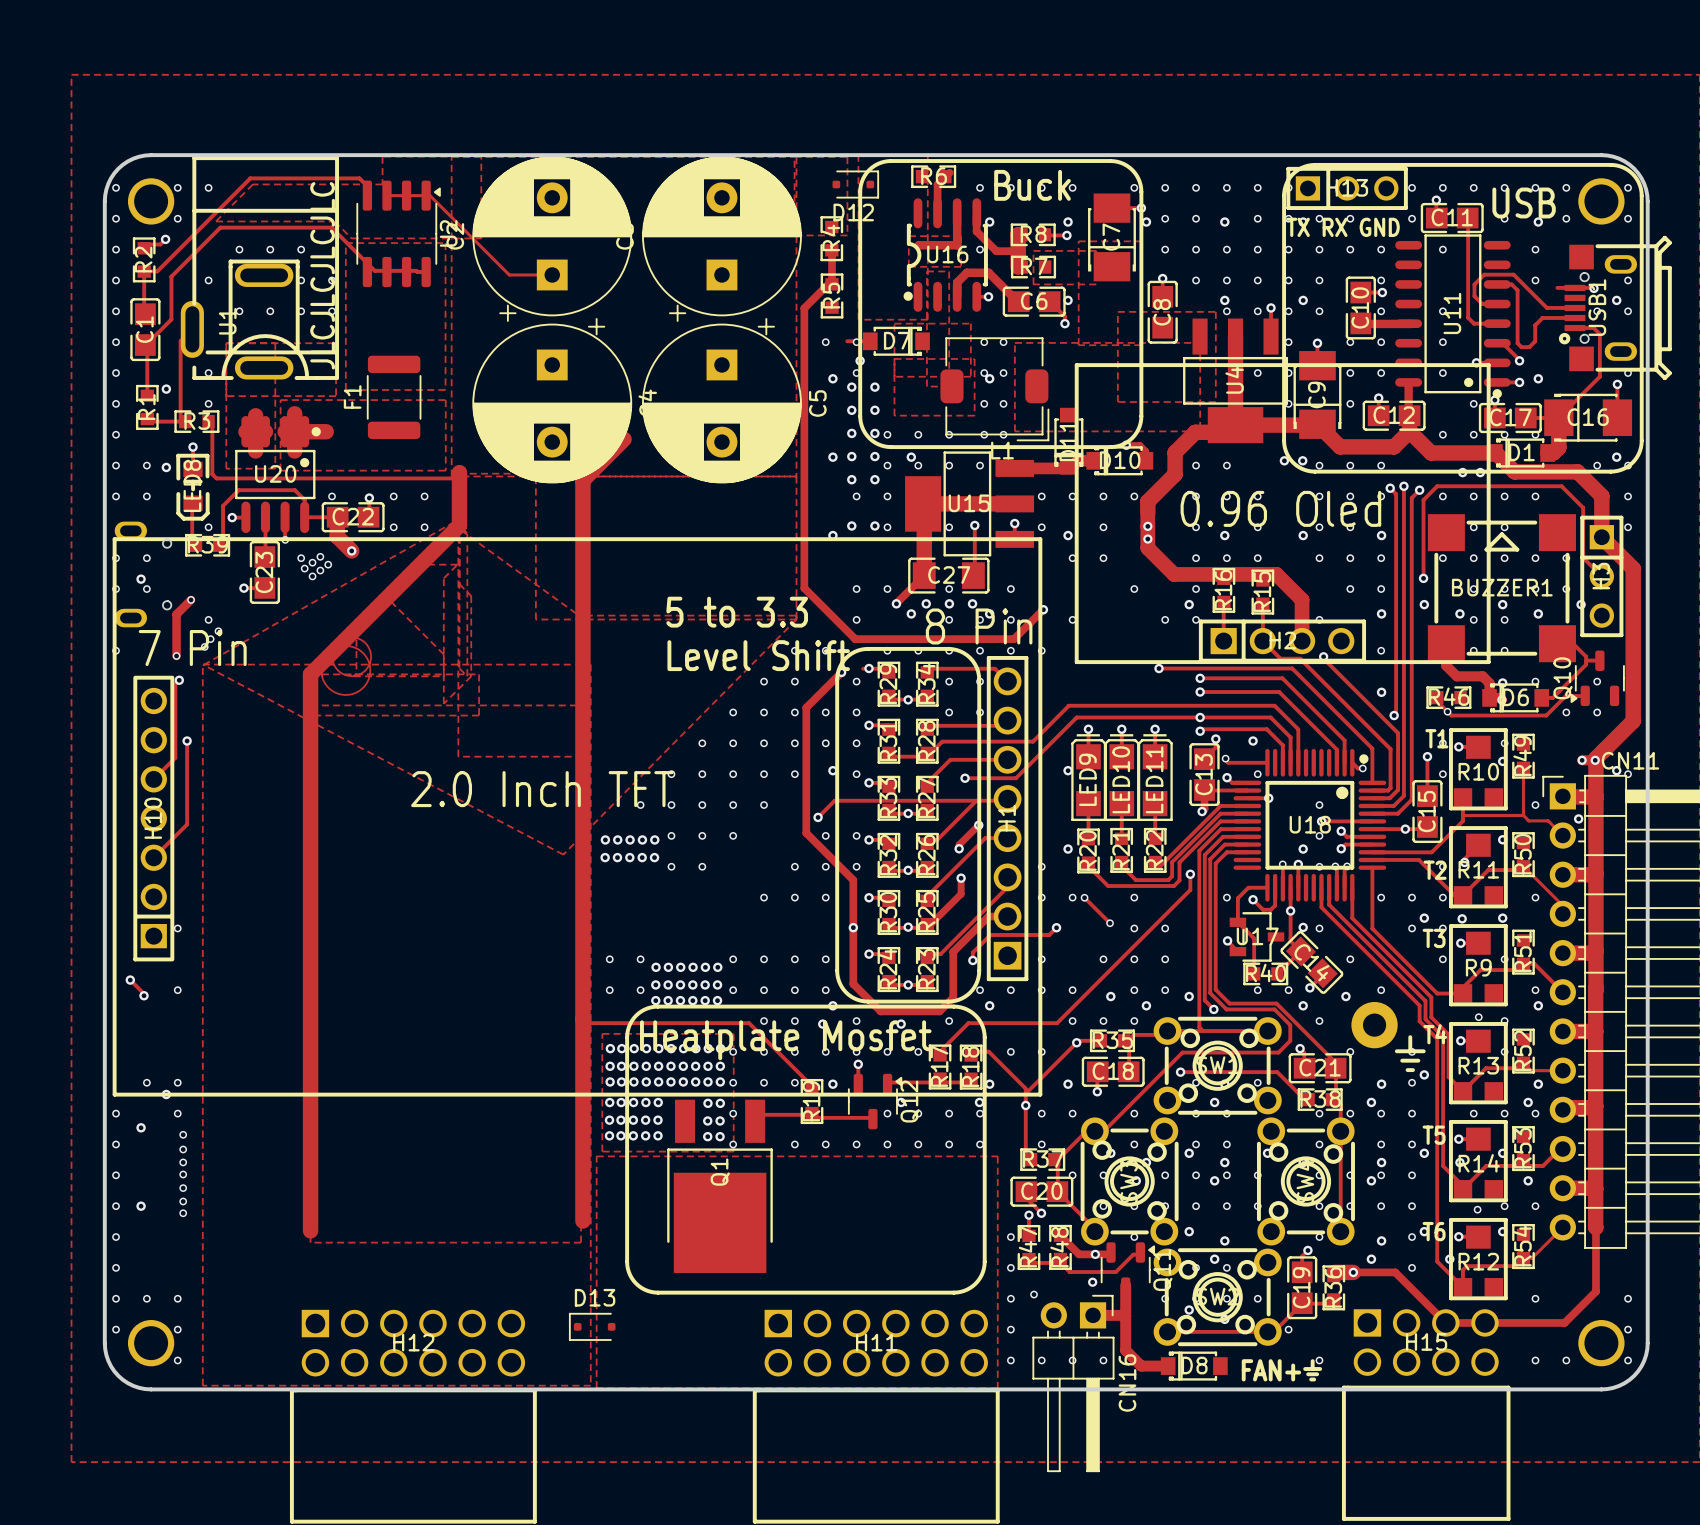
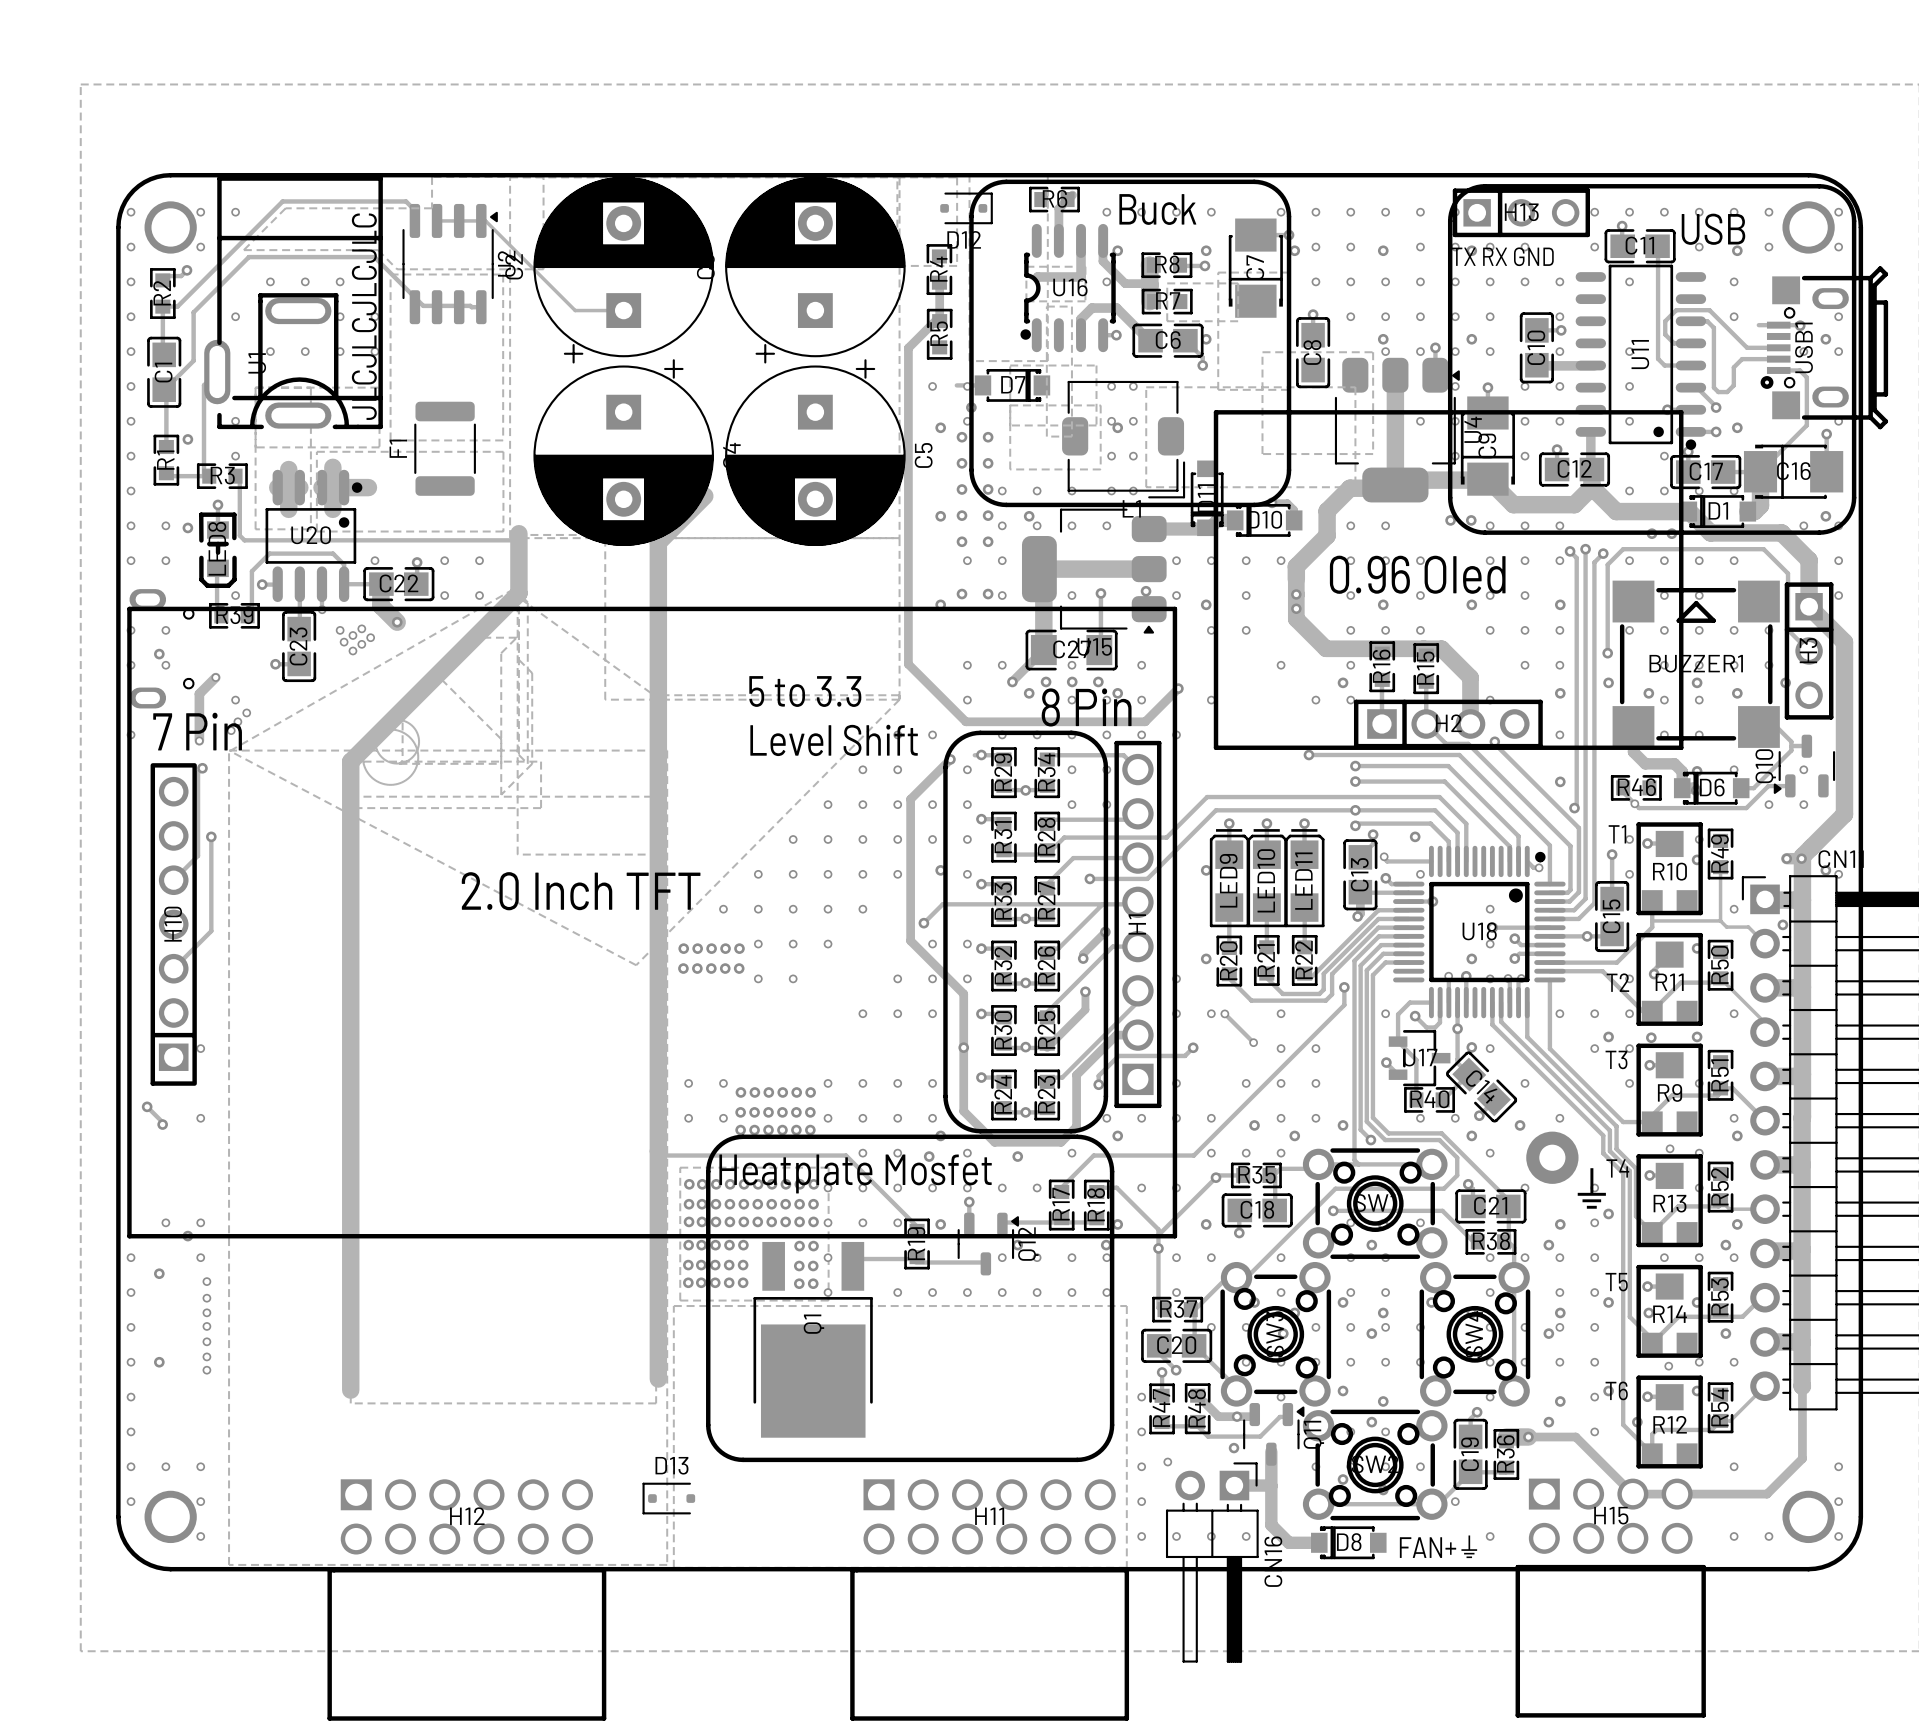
U4 footprint: [1183, 318, 1289, 444] -> [1334, 357, 1460, 503]
U4 name position: U4 (1234, 380) -> U4 (1473, 429)
U15 footprint: [905, 451, 1035, 557] -> [1021, 508, 1167, 634]
U15 name position: U15 (969, 503) -> U15 (1094, 646)

